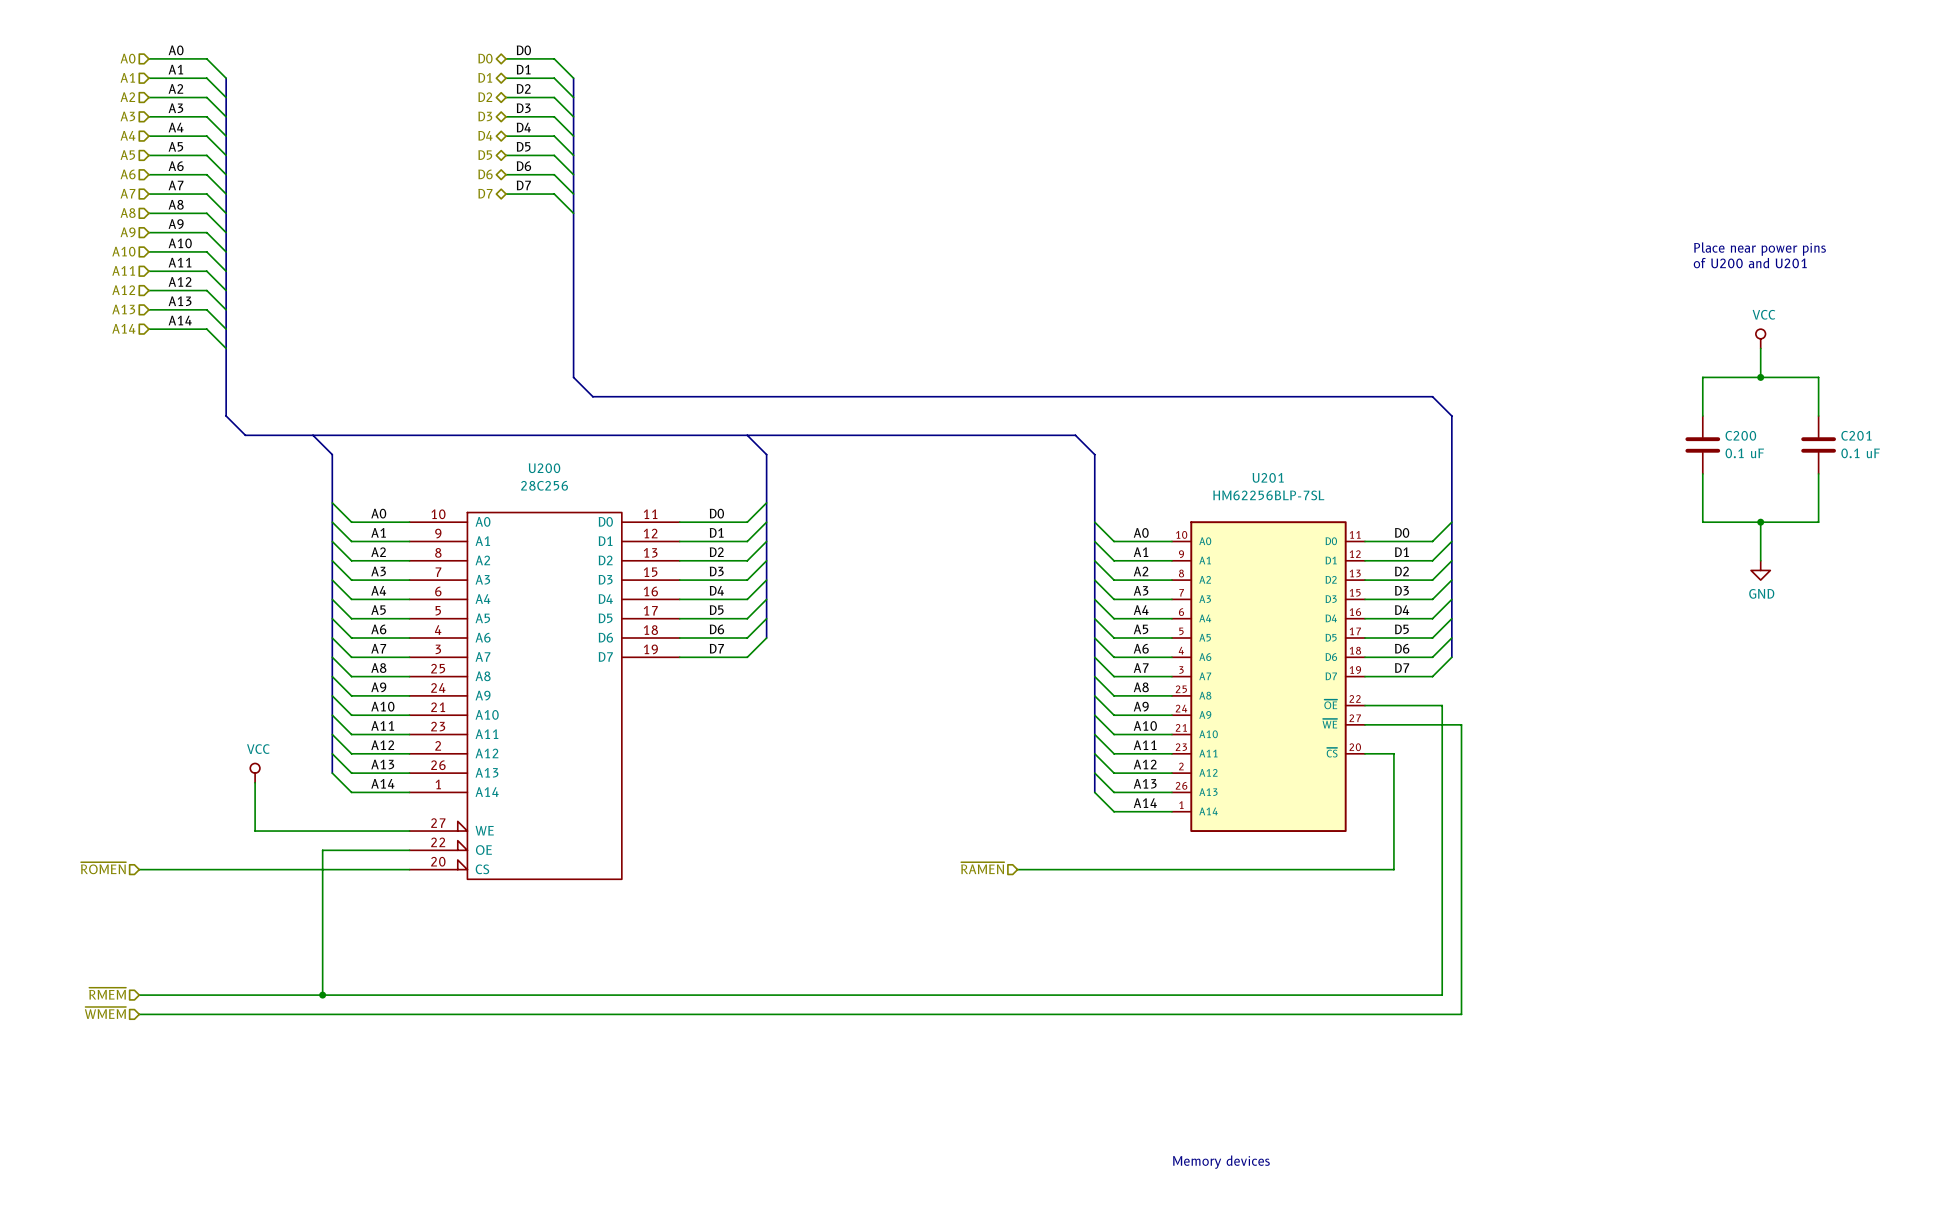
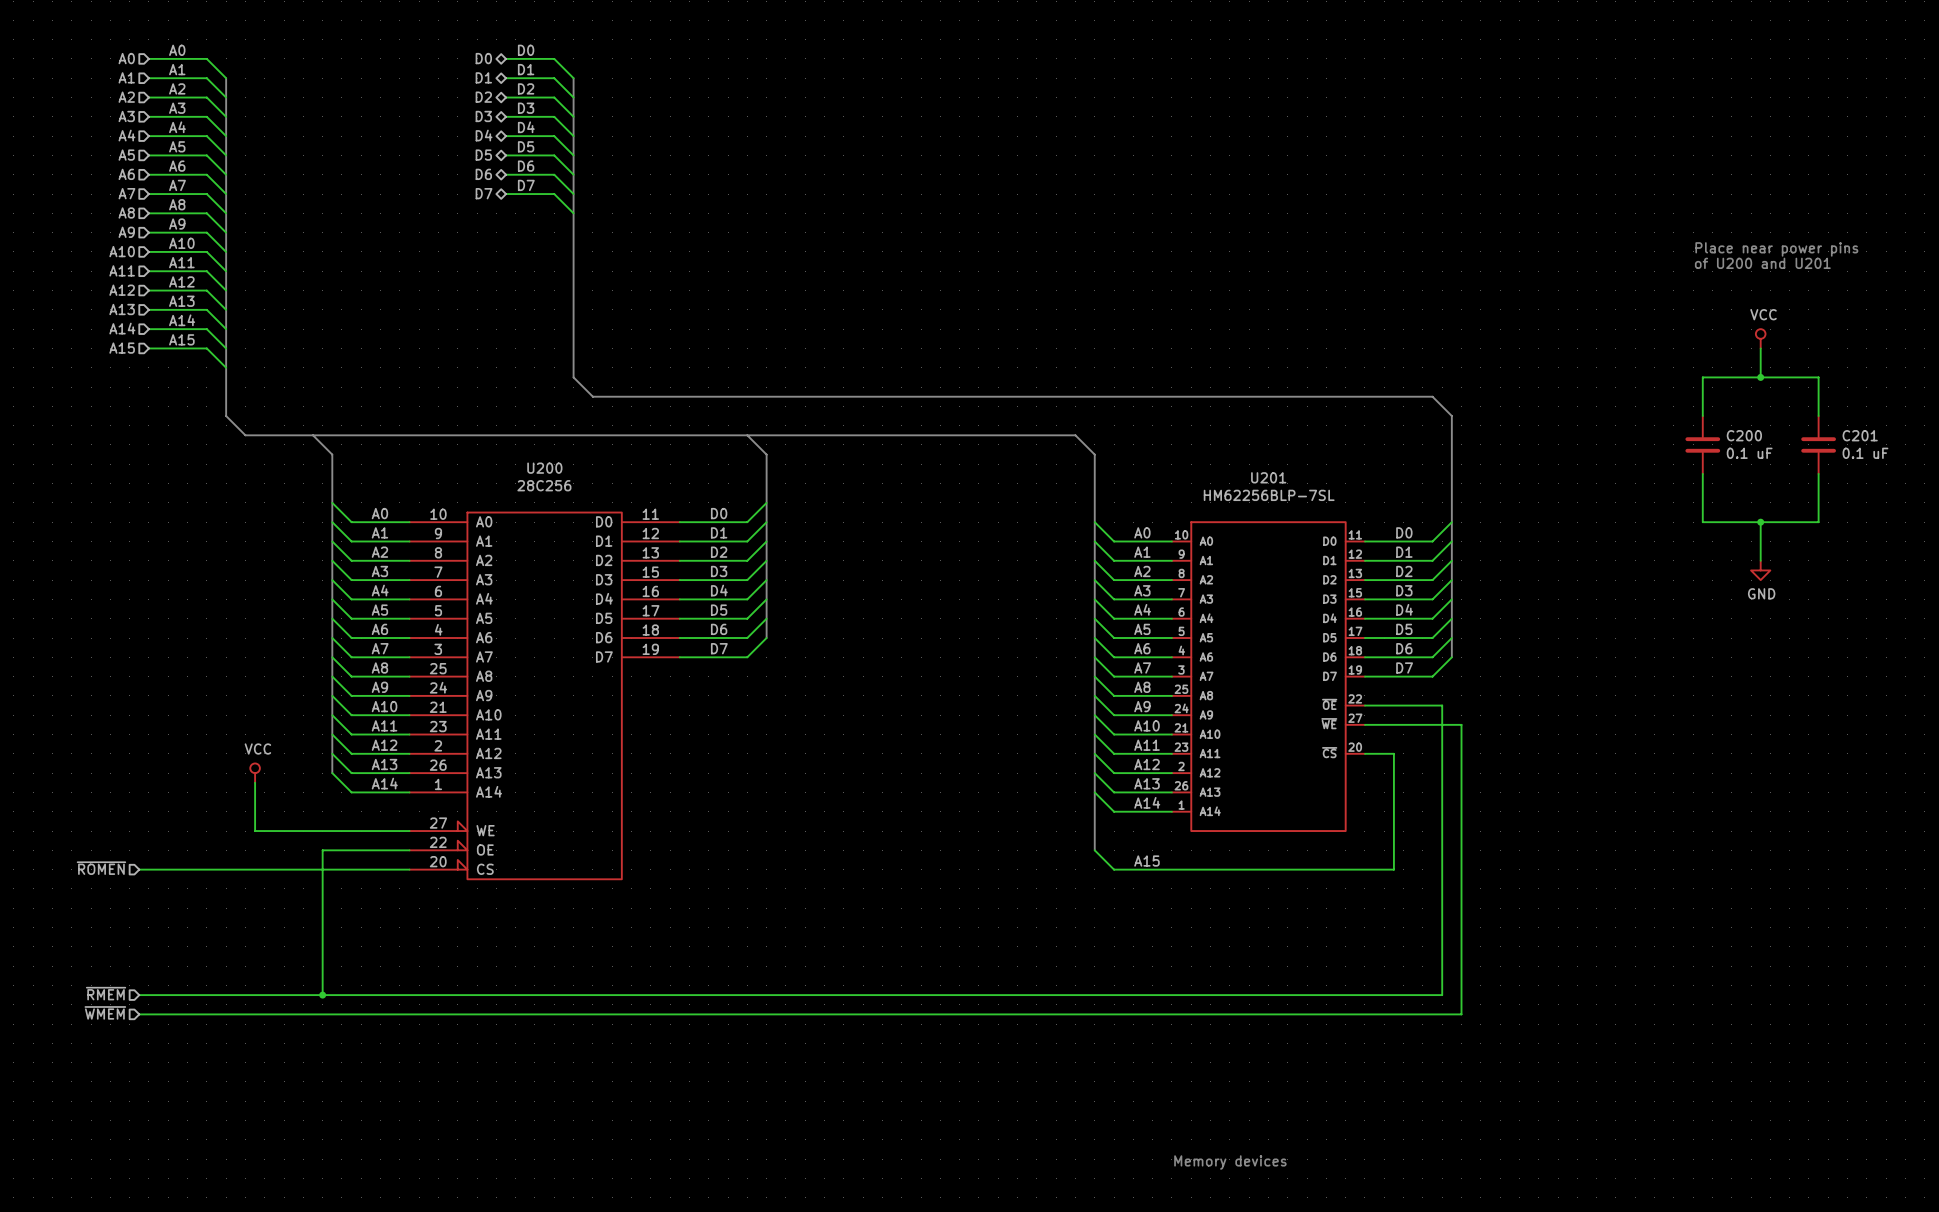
label: none -> A15 (181, 339)
hierarchical label: none -> A15 (122, 348)
wire: none -> (148, 348) (206, 348) (226, 367)
bus: none -> (1094, 792) (1094, 850)
label: none -> A15 (1146, 861)
hierarchical label: ~{RAMEN} (982, 868) -> none
wire: (1017, 869) (1114, 869) -> (1094, 850) (1114, 869)

